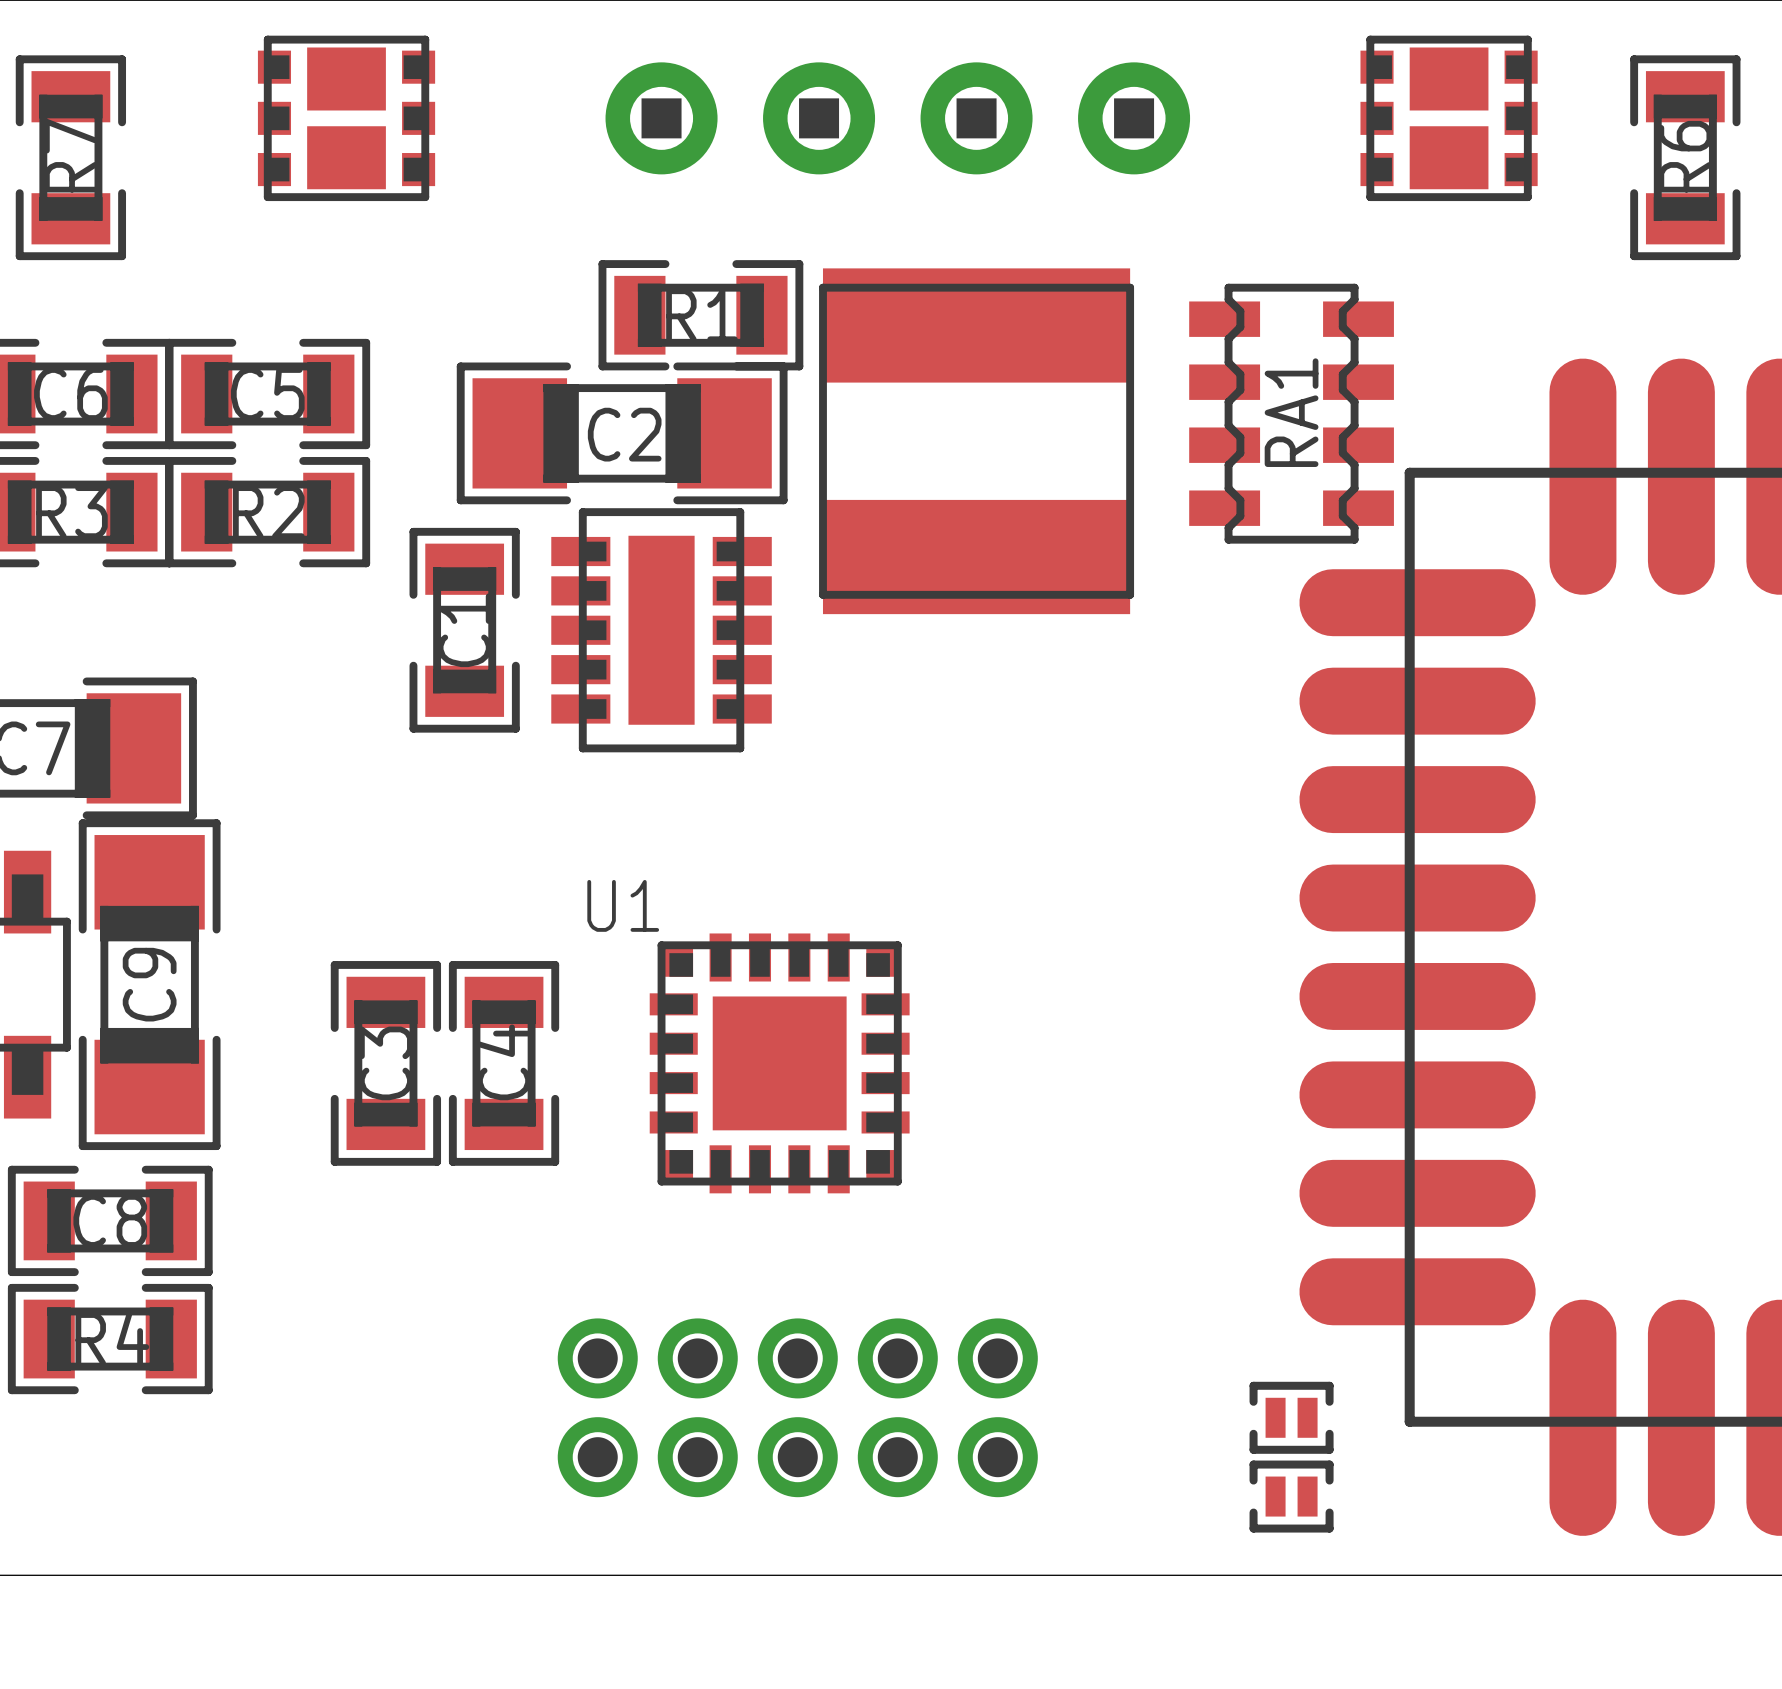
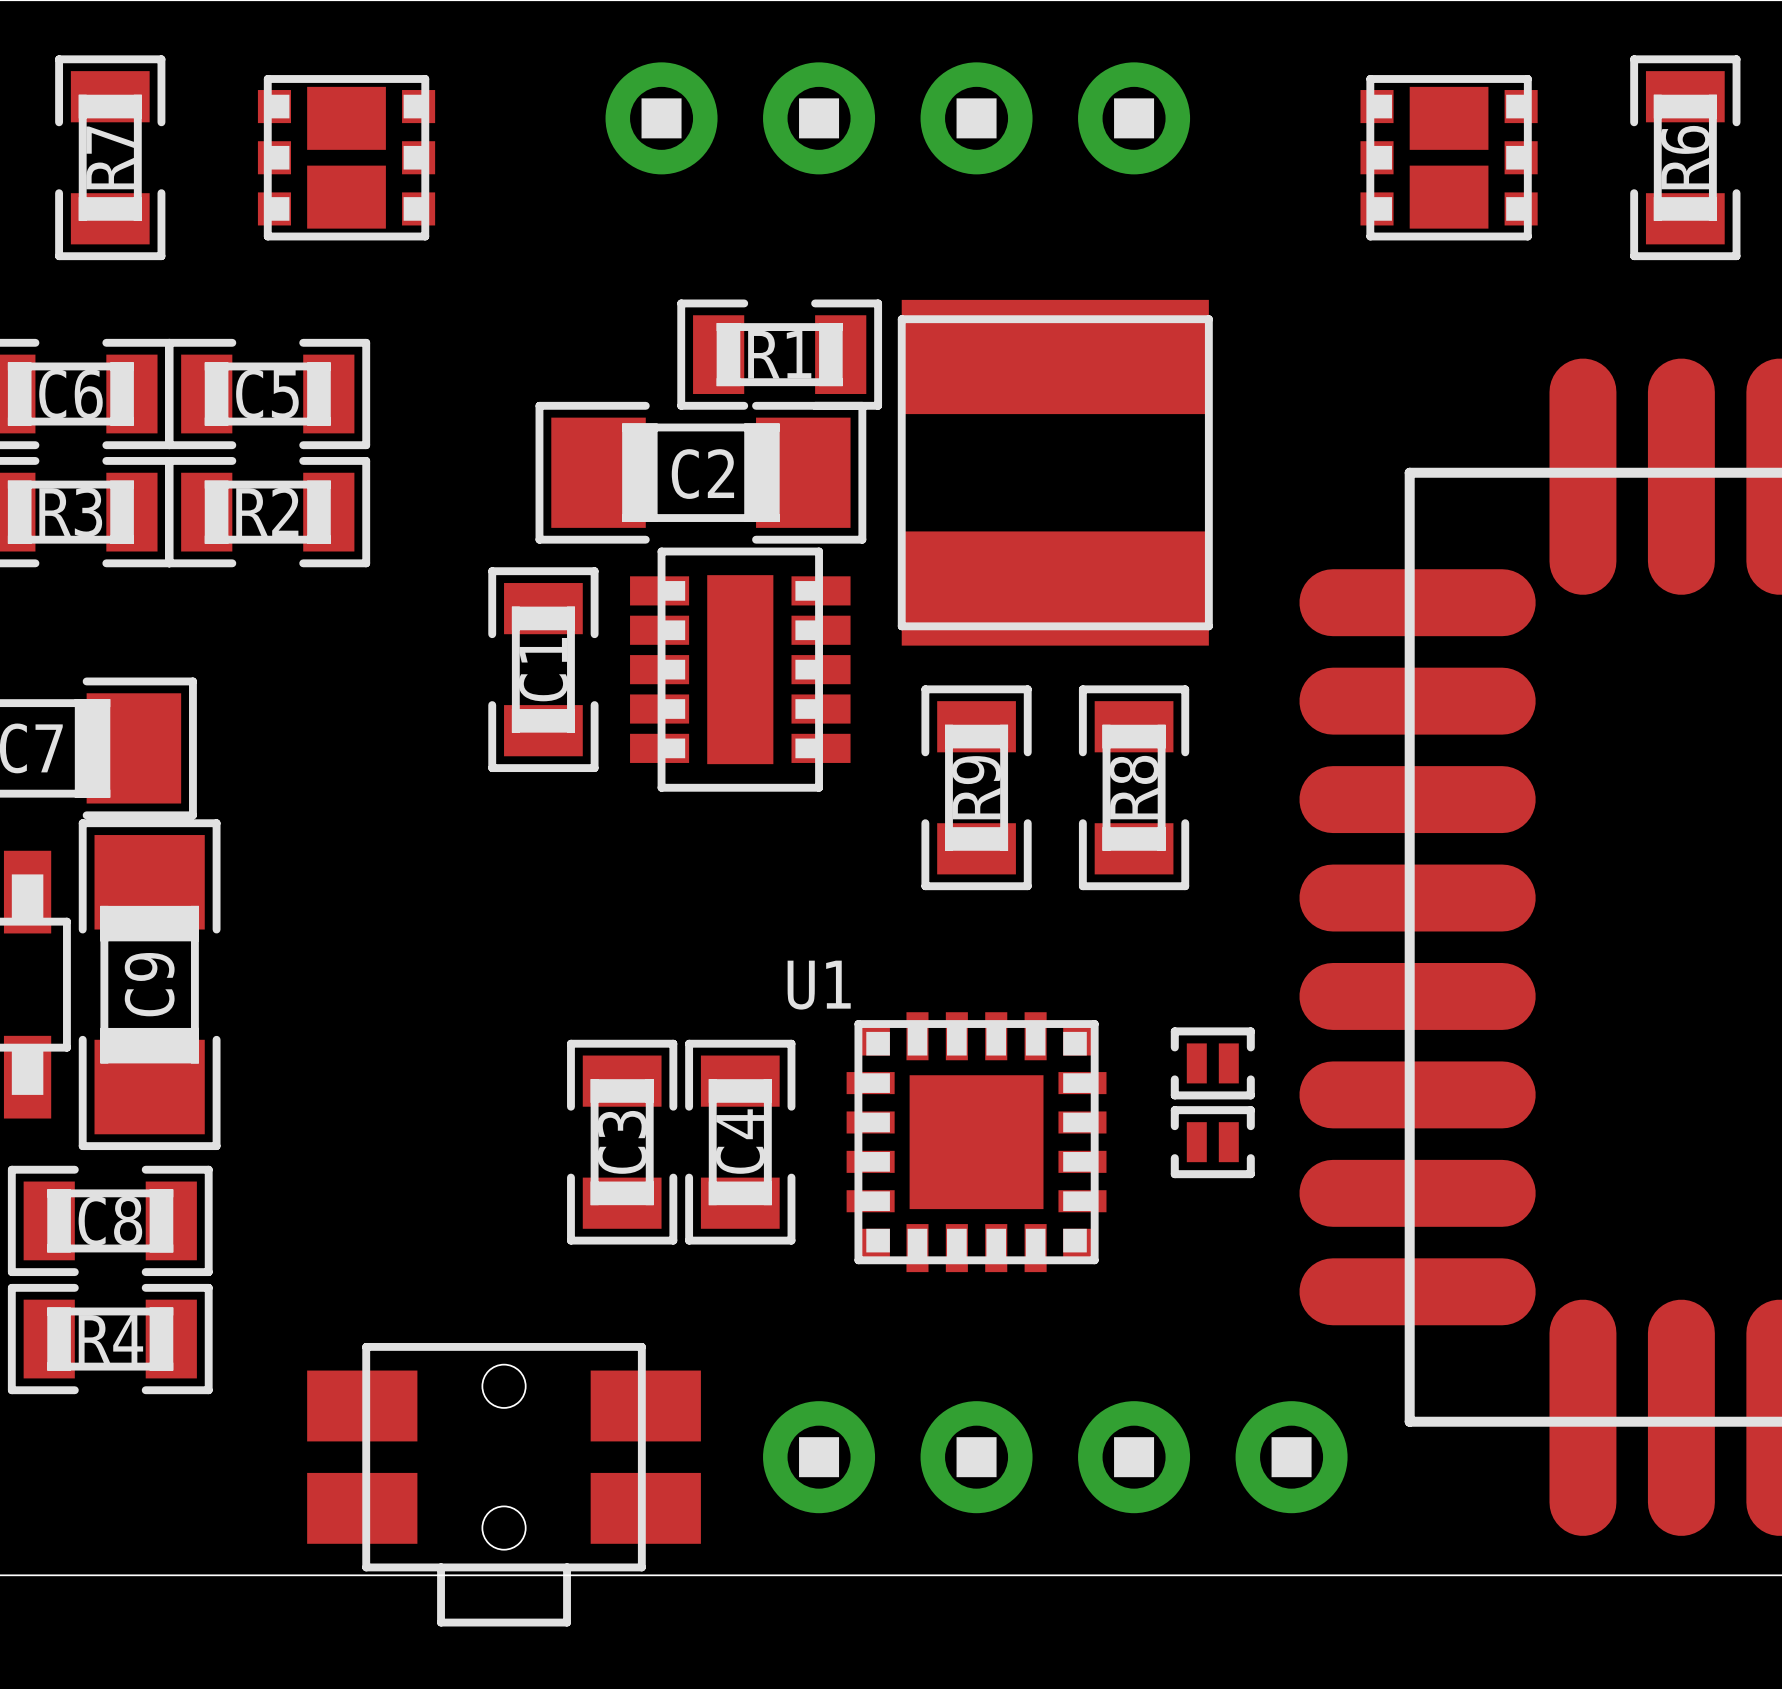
part position: (346, 118) -> (346, 157)
part position: (1449, 118) -> (1449, 157)
R7 position: (70, 157) -> (110, 157)
R1 position: (700, 315) -> (779, 354)
RA1: (1291, 413) -> none
C2 position: (622, 433) -> (700, 472)
part position: (976, 441) -> (1055, 472)
C1 position: (464, 630) -> (543, 669)
part position: (661, 630) -> (740, 669)
R9: none -> (976, 787)
R8: none -> (1134, 787)
C3 position: (385, 1063) -> (622, 1142)
C4 position: (504, 1063) -> (740, 1142)
U1 position: (779, 1063) -> (976, 1142)
part: none -> (1212, 1063)
part: none -> (1212, 1142)
part: (797, 1358) -> none
part: (1291, 1417) -> none
part: (797, 1457) -> none
part: none -> (1055, 1457)
part: none -> (504, 1484)
part: (1291, 1496) -> none

